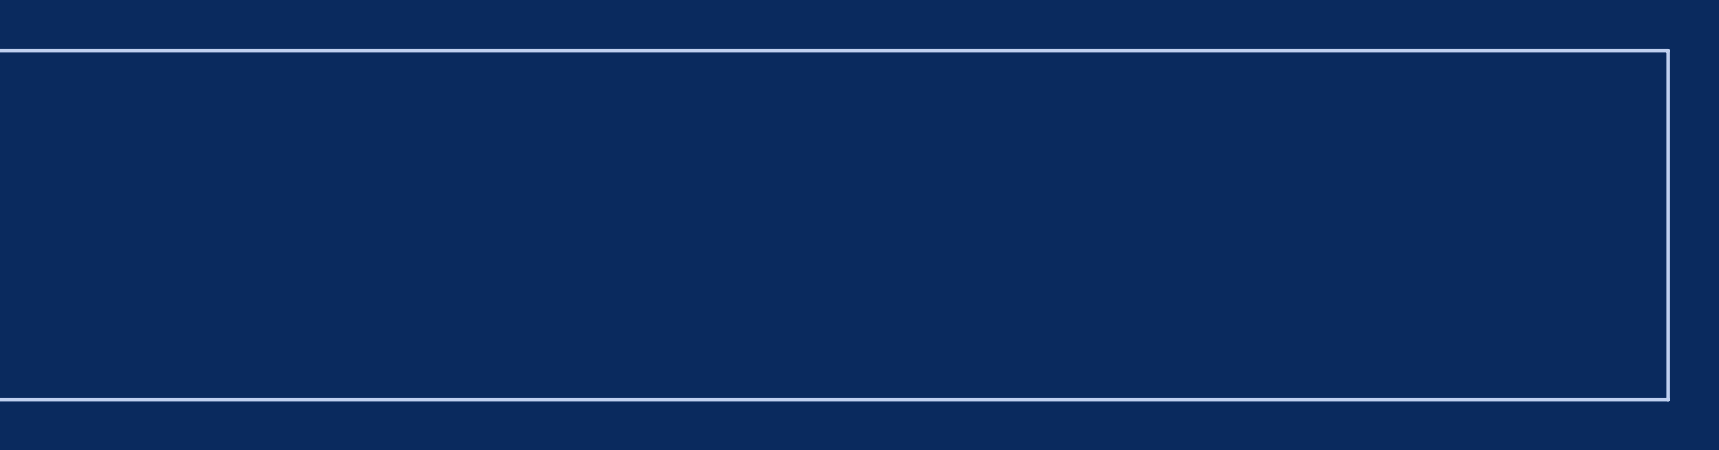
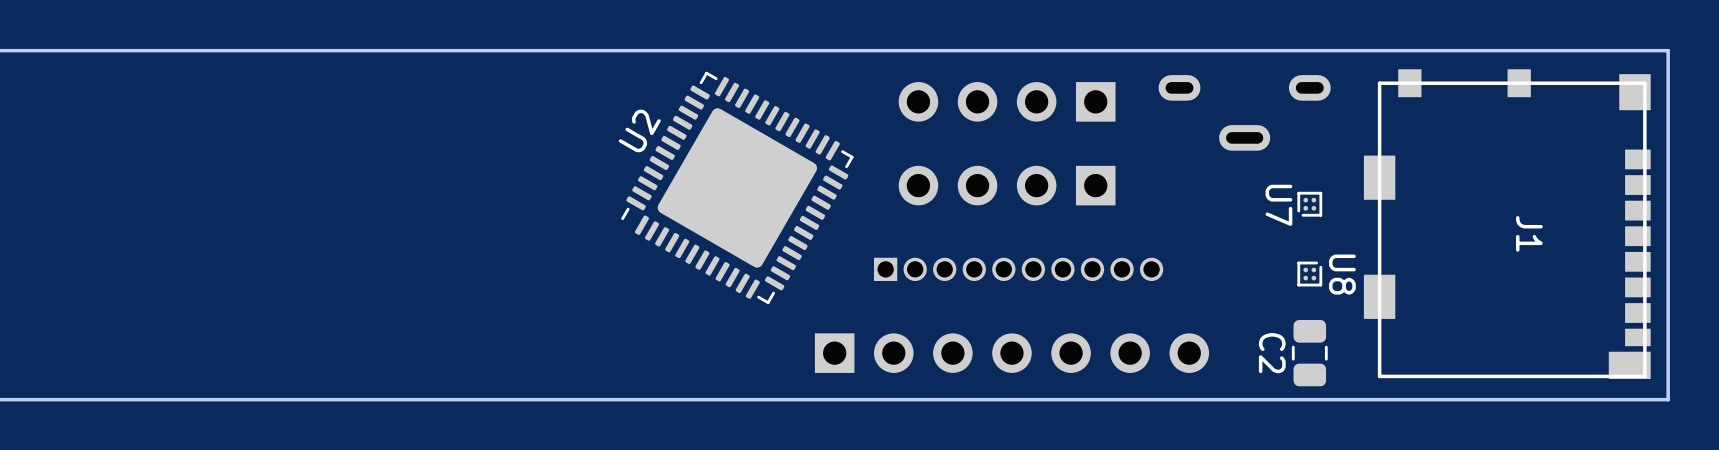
part: none -> (1007, 101)
part: none -> (1244, 112)
part: none -> (1007, 185)
U2: none -> (737, 187)
U7: none -> (1309, 204)
J1: none -> (1507, 224)
part: none -> (1018, 269)
U8: none -> (1309, 274)
part: none -> (1011, 353)
C2: none -> (1309, 353)

